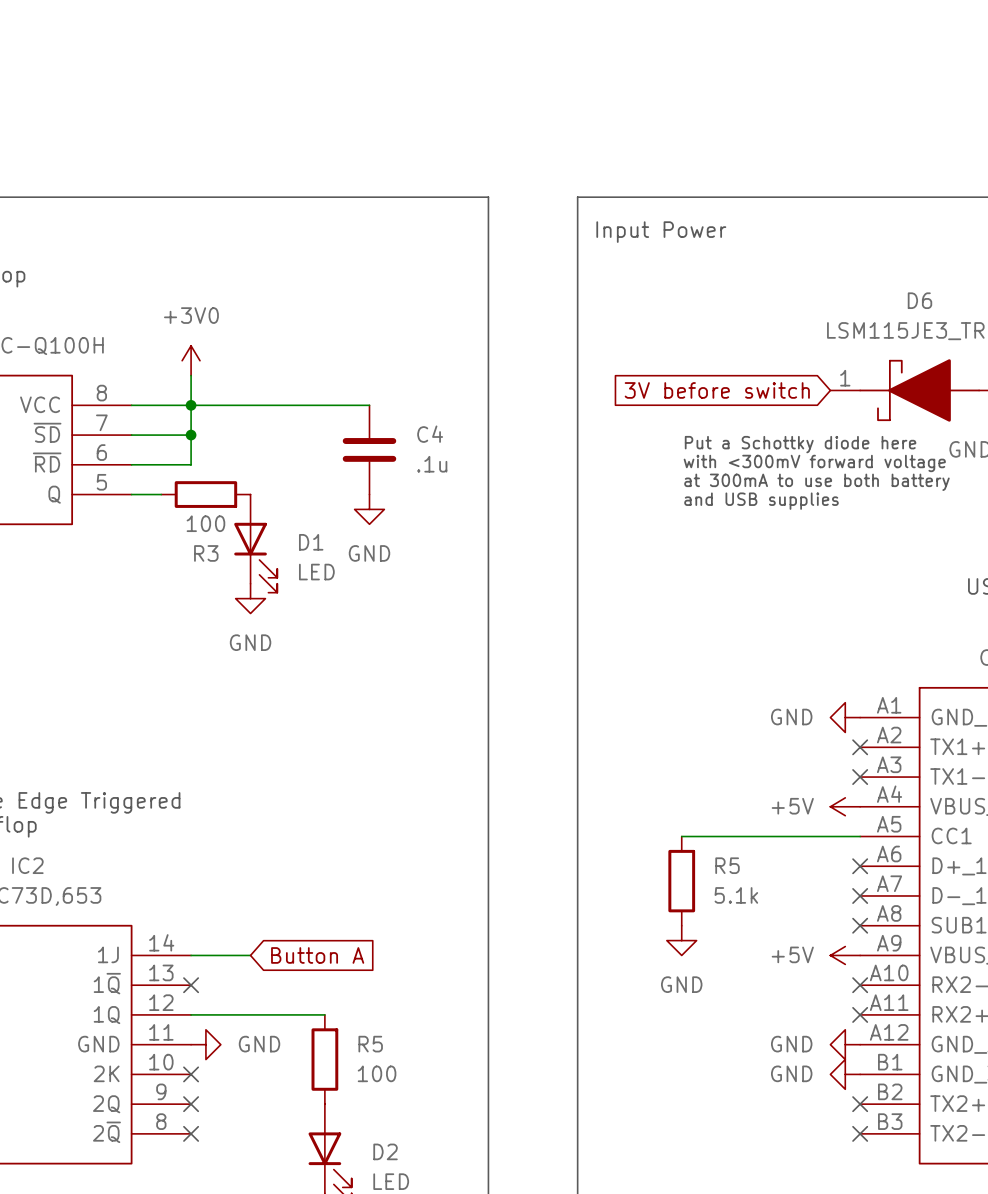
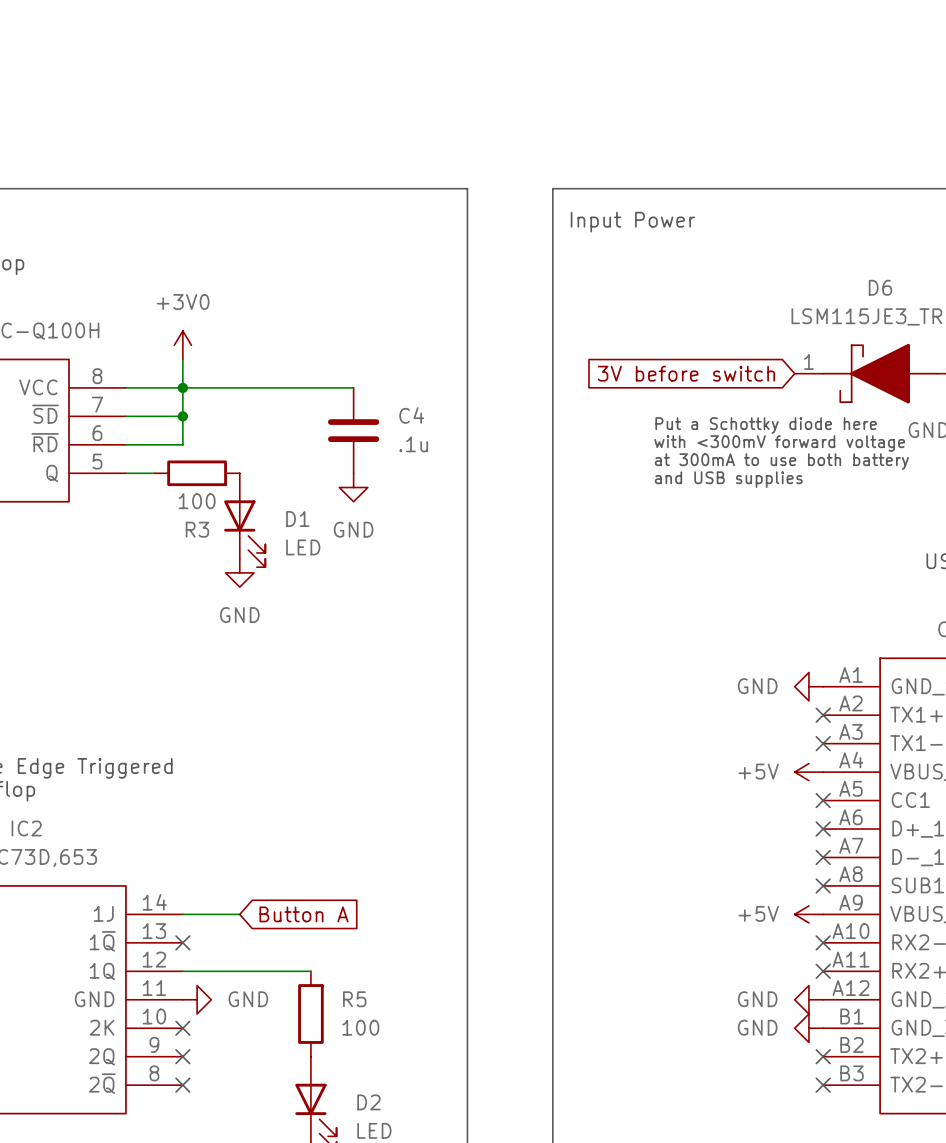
wire: (681, 836) (860, 836) -> none
no-connect mark: none -> (823, 800)
R5: 5.1k (681, 881) -> none
power symbol: GND (681, 940) -> none

